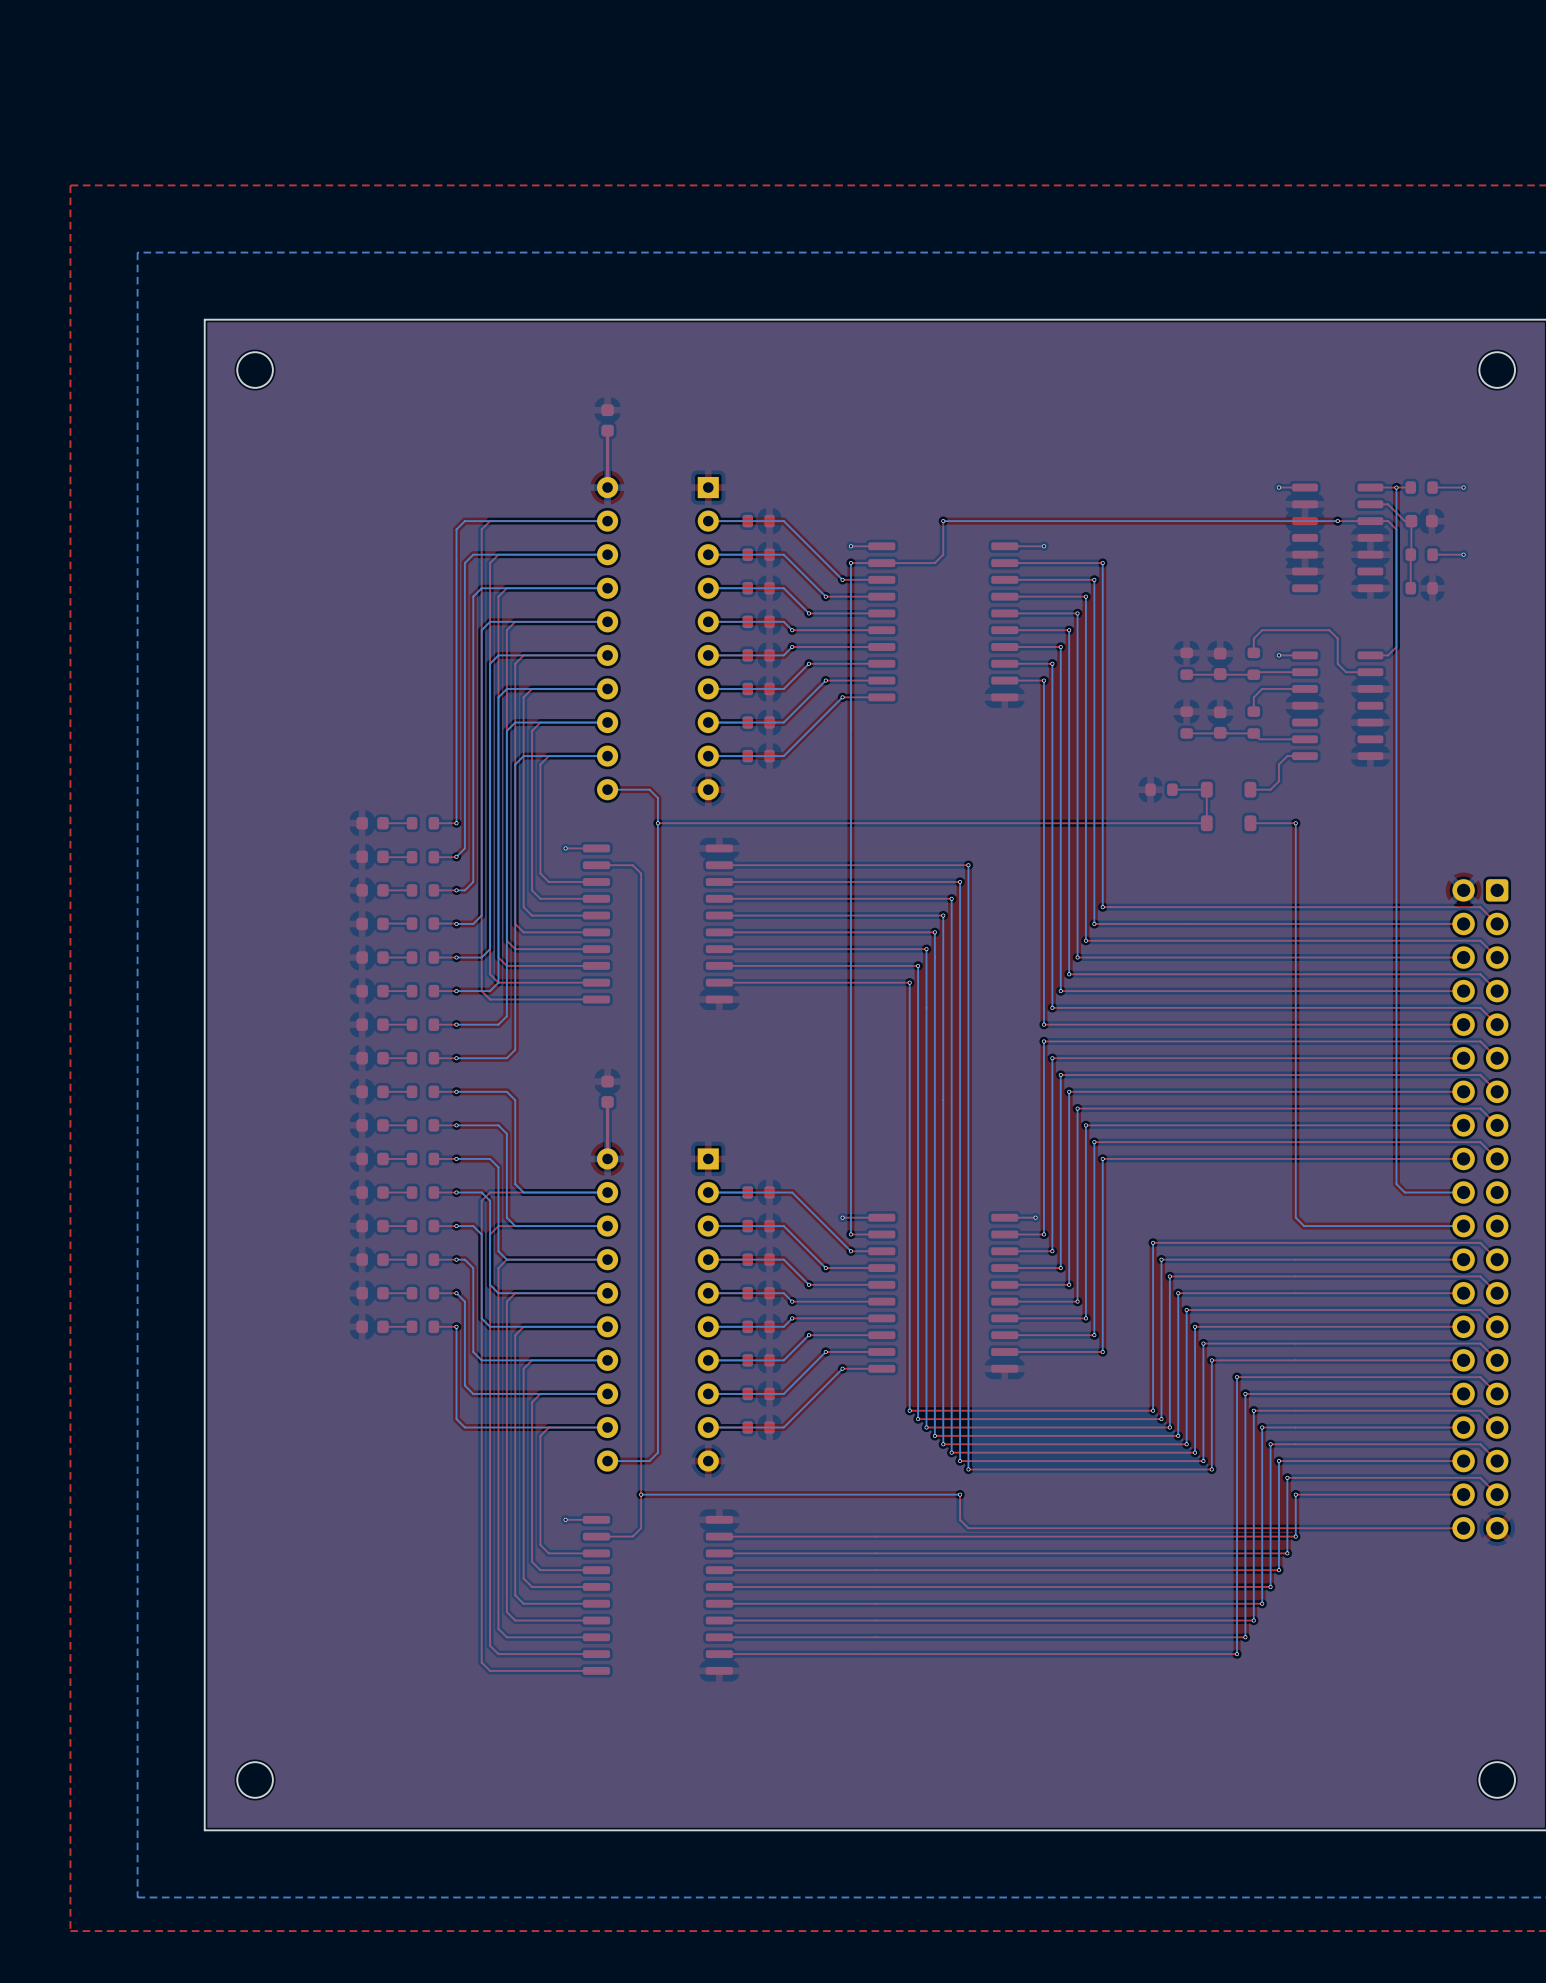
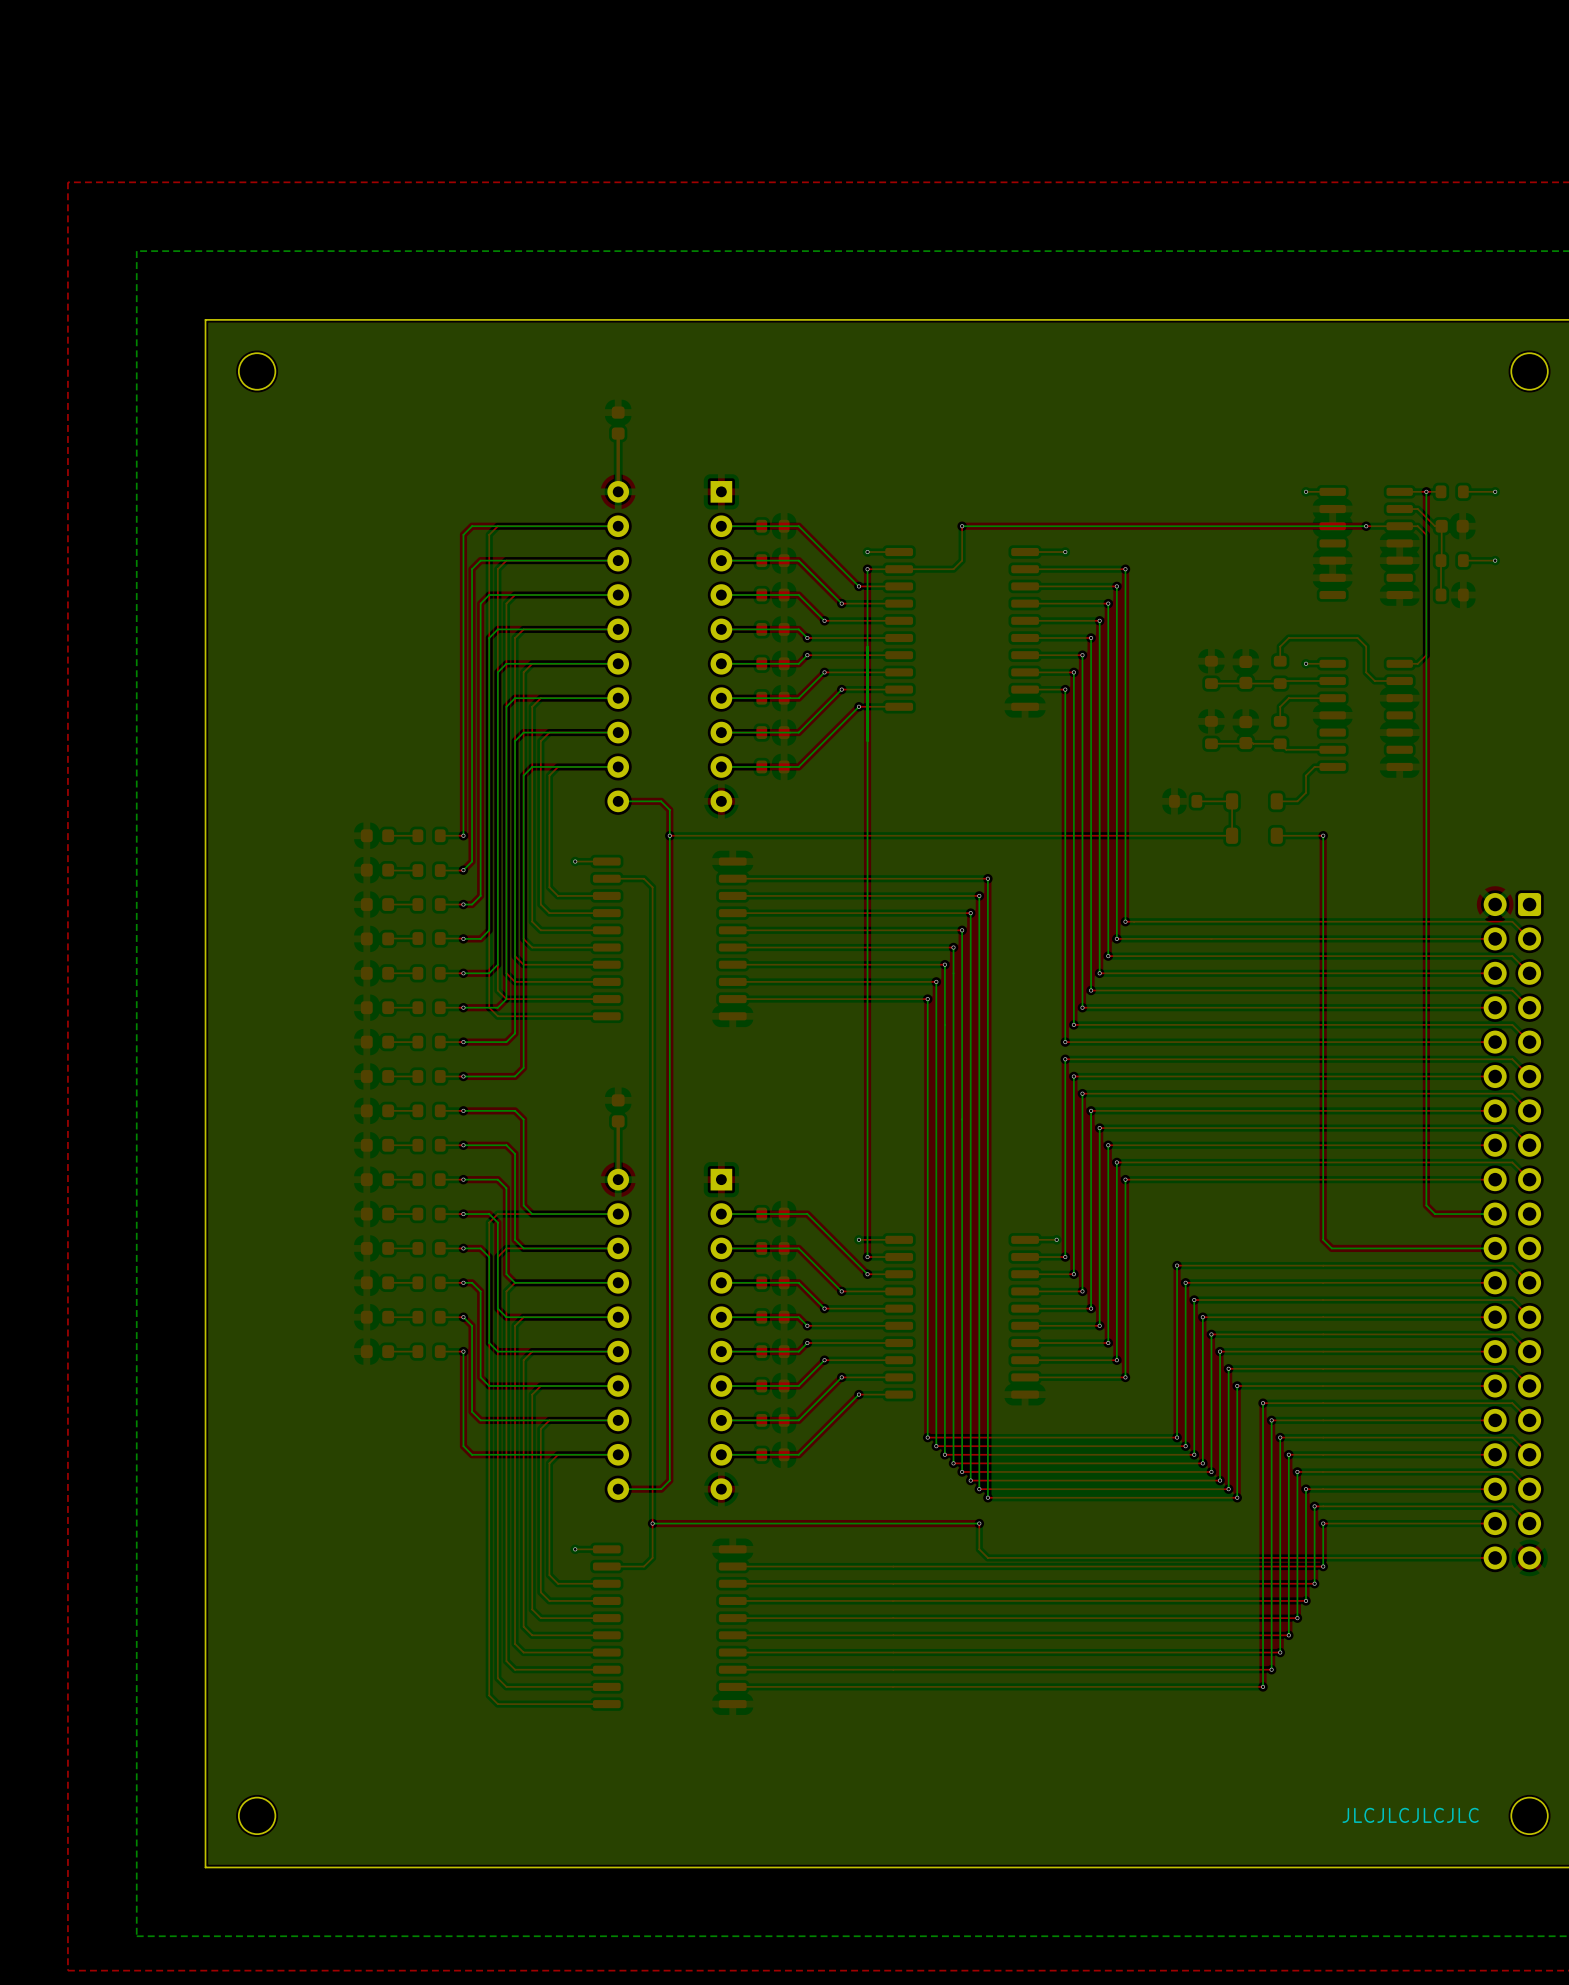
text: none -> JLCJLCJLCJLC (1410, 1815)

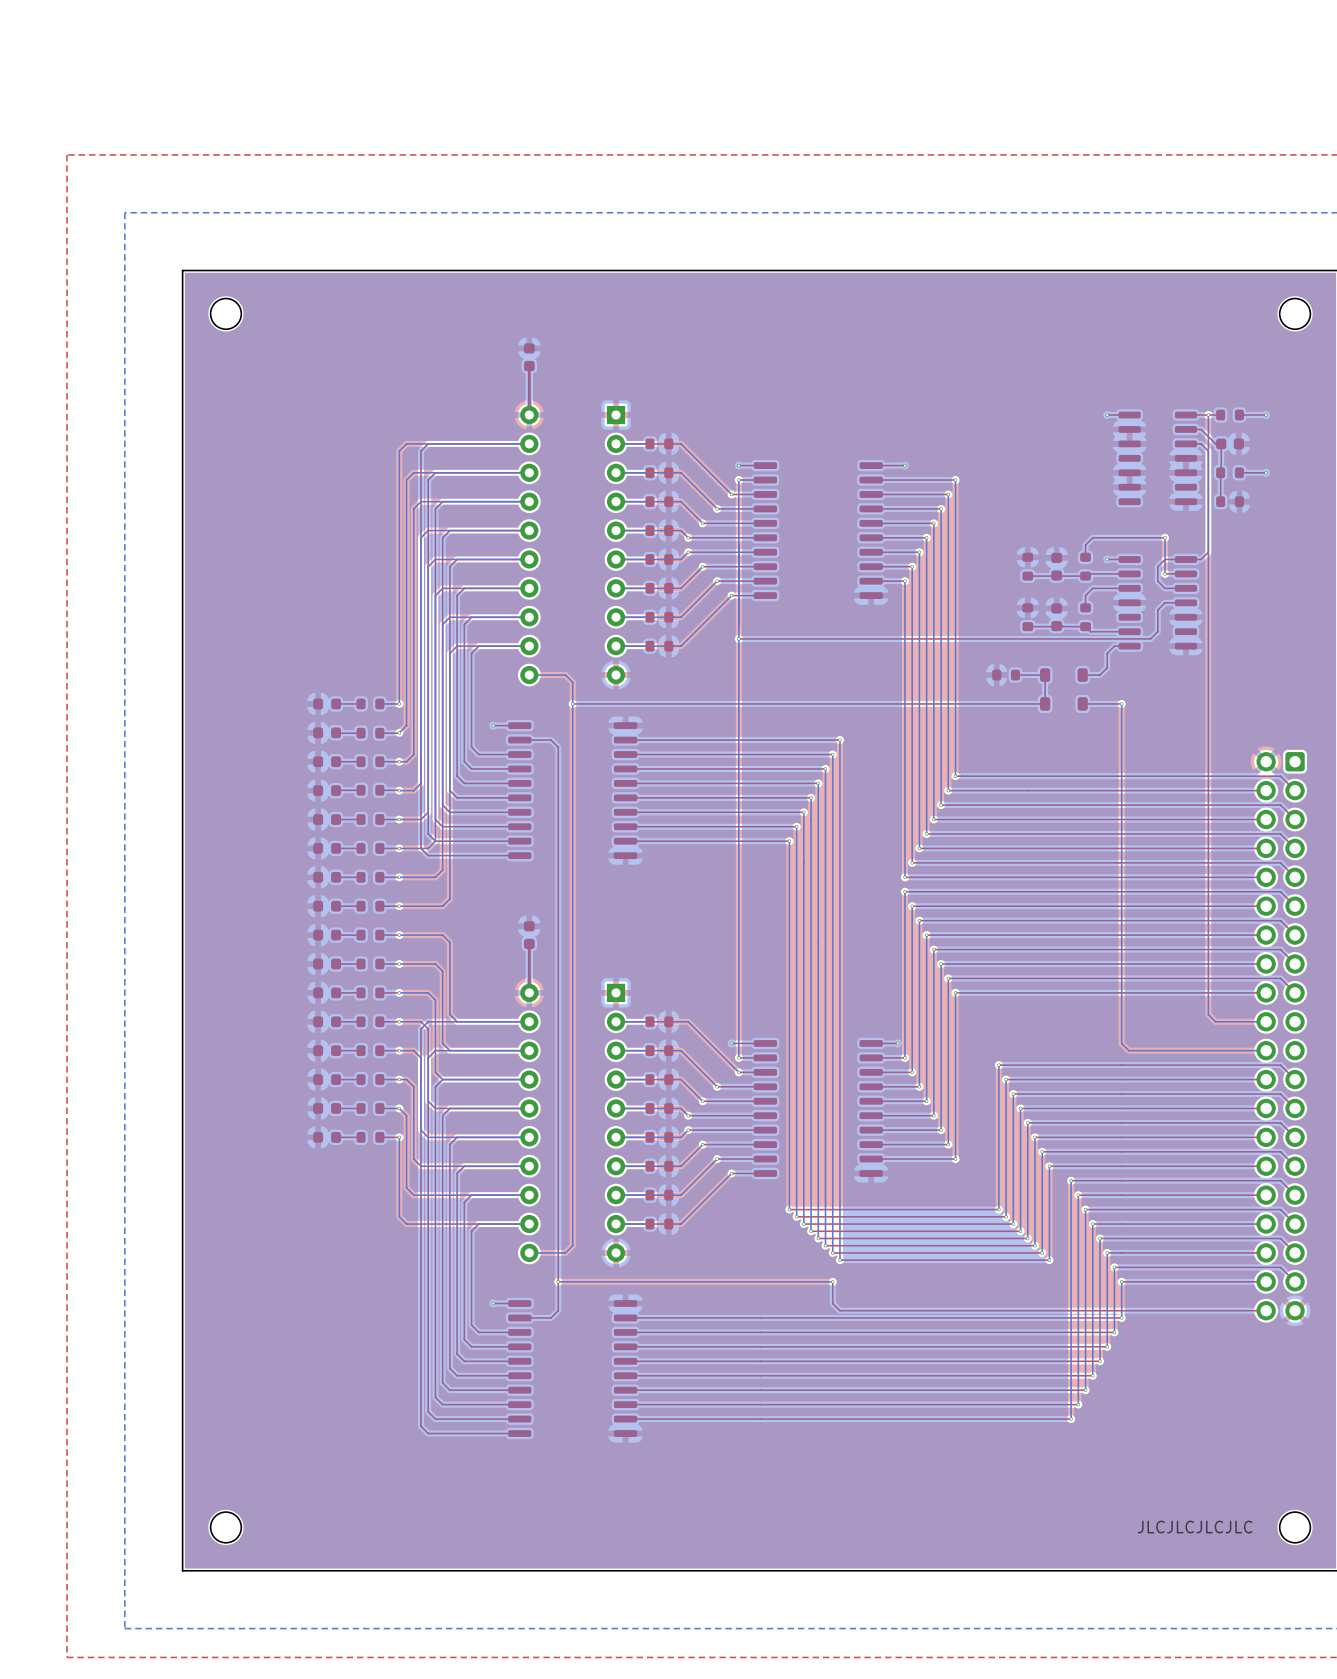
top track: (962, 526) (962, 560) (953, 569) (899, 569) -> none
via: (962, 526) -> none
bottom track: (1366, 526) (962, 526) -> none
via: (1366, 526) -> none
top track: (1399, 526) (1366, 526) -> none
top track: (1357, 638) (1366, 646) (1366, 672) (1374, 680) -> (1150, 537) (1165, 537)
bottom track: none -> (1165, 537) (1165, 573)
via: none -> (1165, 537)
top track: none -> (1185, 559) (1165, 559) (1157, 566) (1157, 581) (1165, 588) (1185, 588)
via: none -> (1165, 573)
top track: none -> (1185, 602) (1165, 602) (1157, 610) (1157, 631) (1150, 638) (738, 638)
via: none -> (738, 638)

